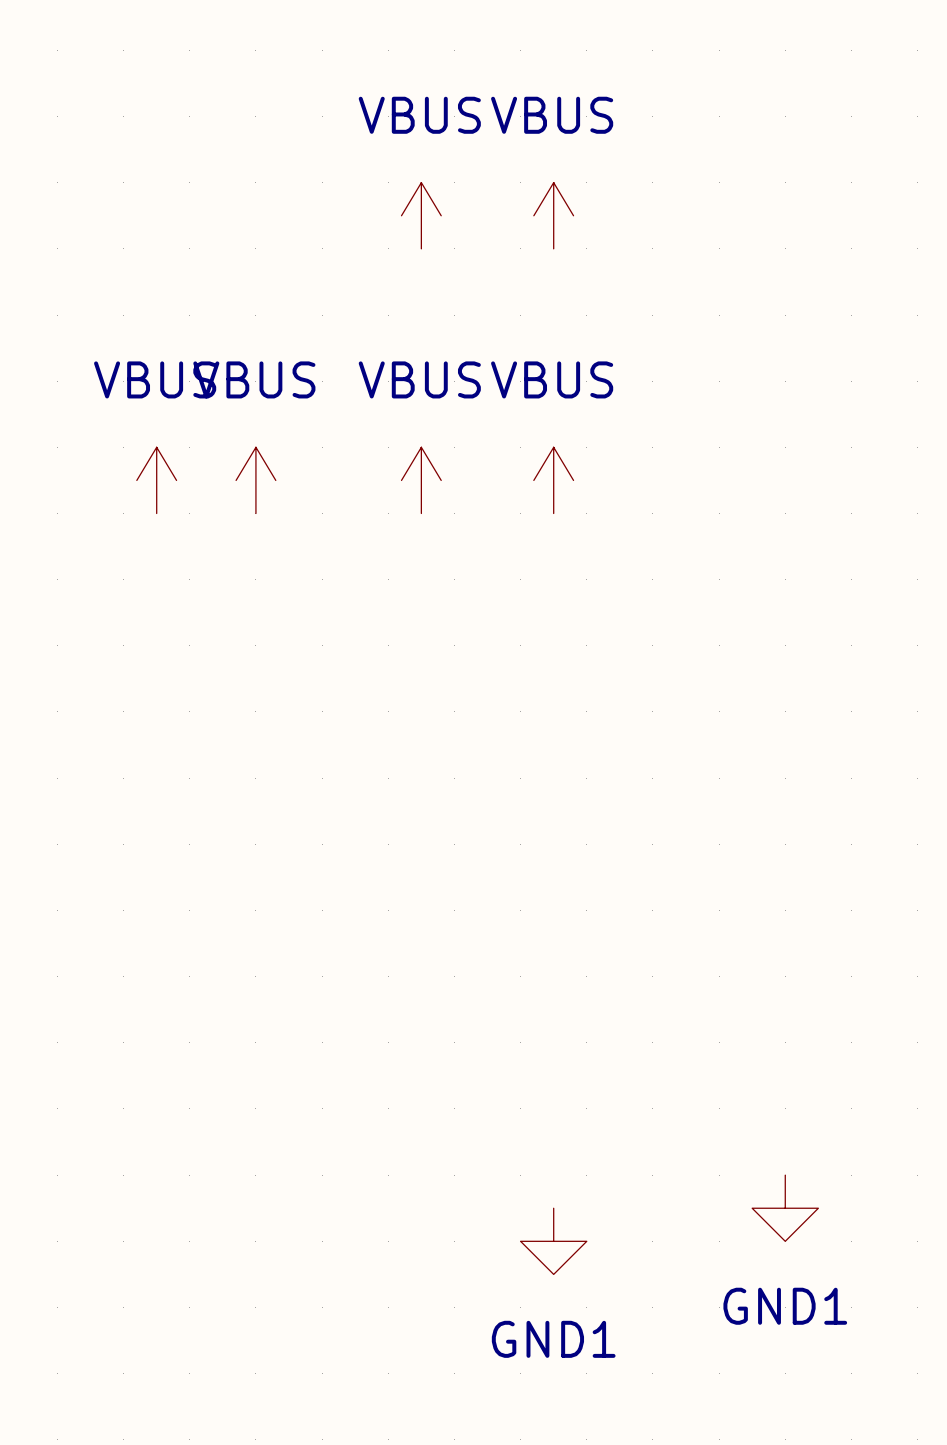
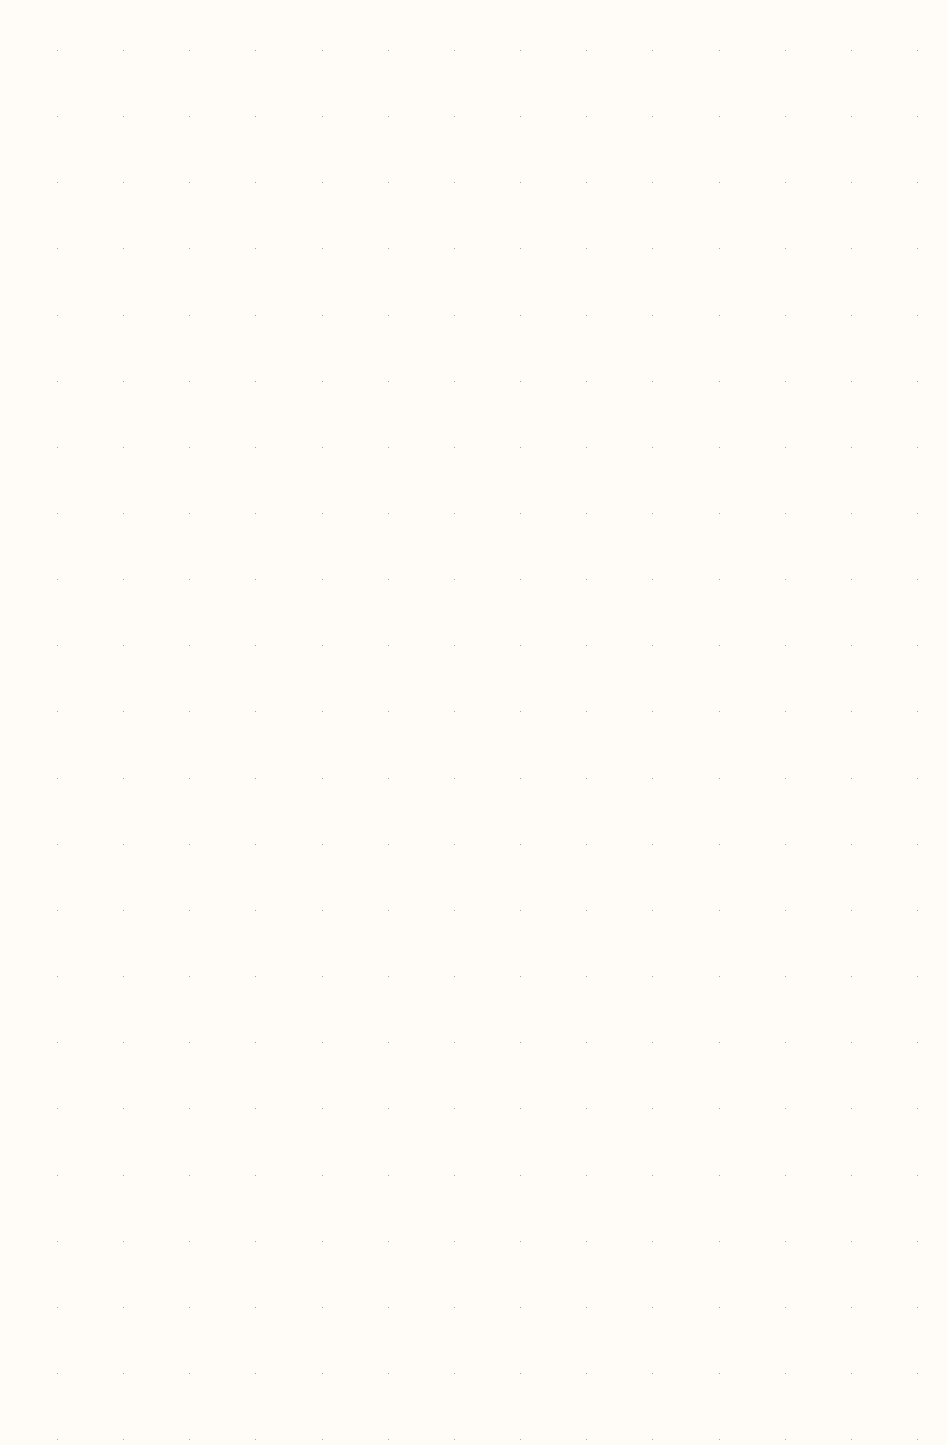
power symbol: VBUS (421, 215) -> none
power symbol: VBUS (553, 215) -> none
power symbol: VBUS (156, 480) -> none
power symbol: VBUS (255, 480) -> none
power symbol: VBUS (421, 480) -> none
power symbol: VBUS (553, 480) -> none
power symbol: GND1 (785, 1208) -> none
power symbol: GND1 (553, 1241) -> none

